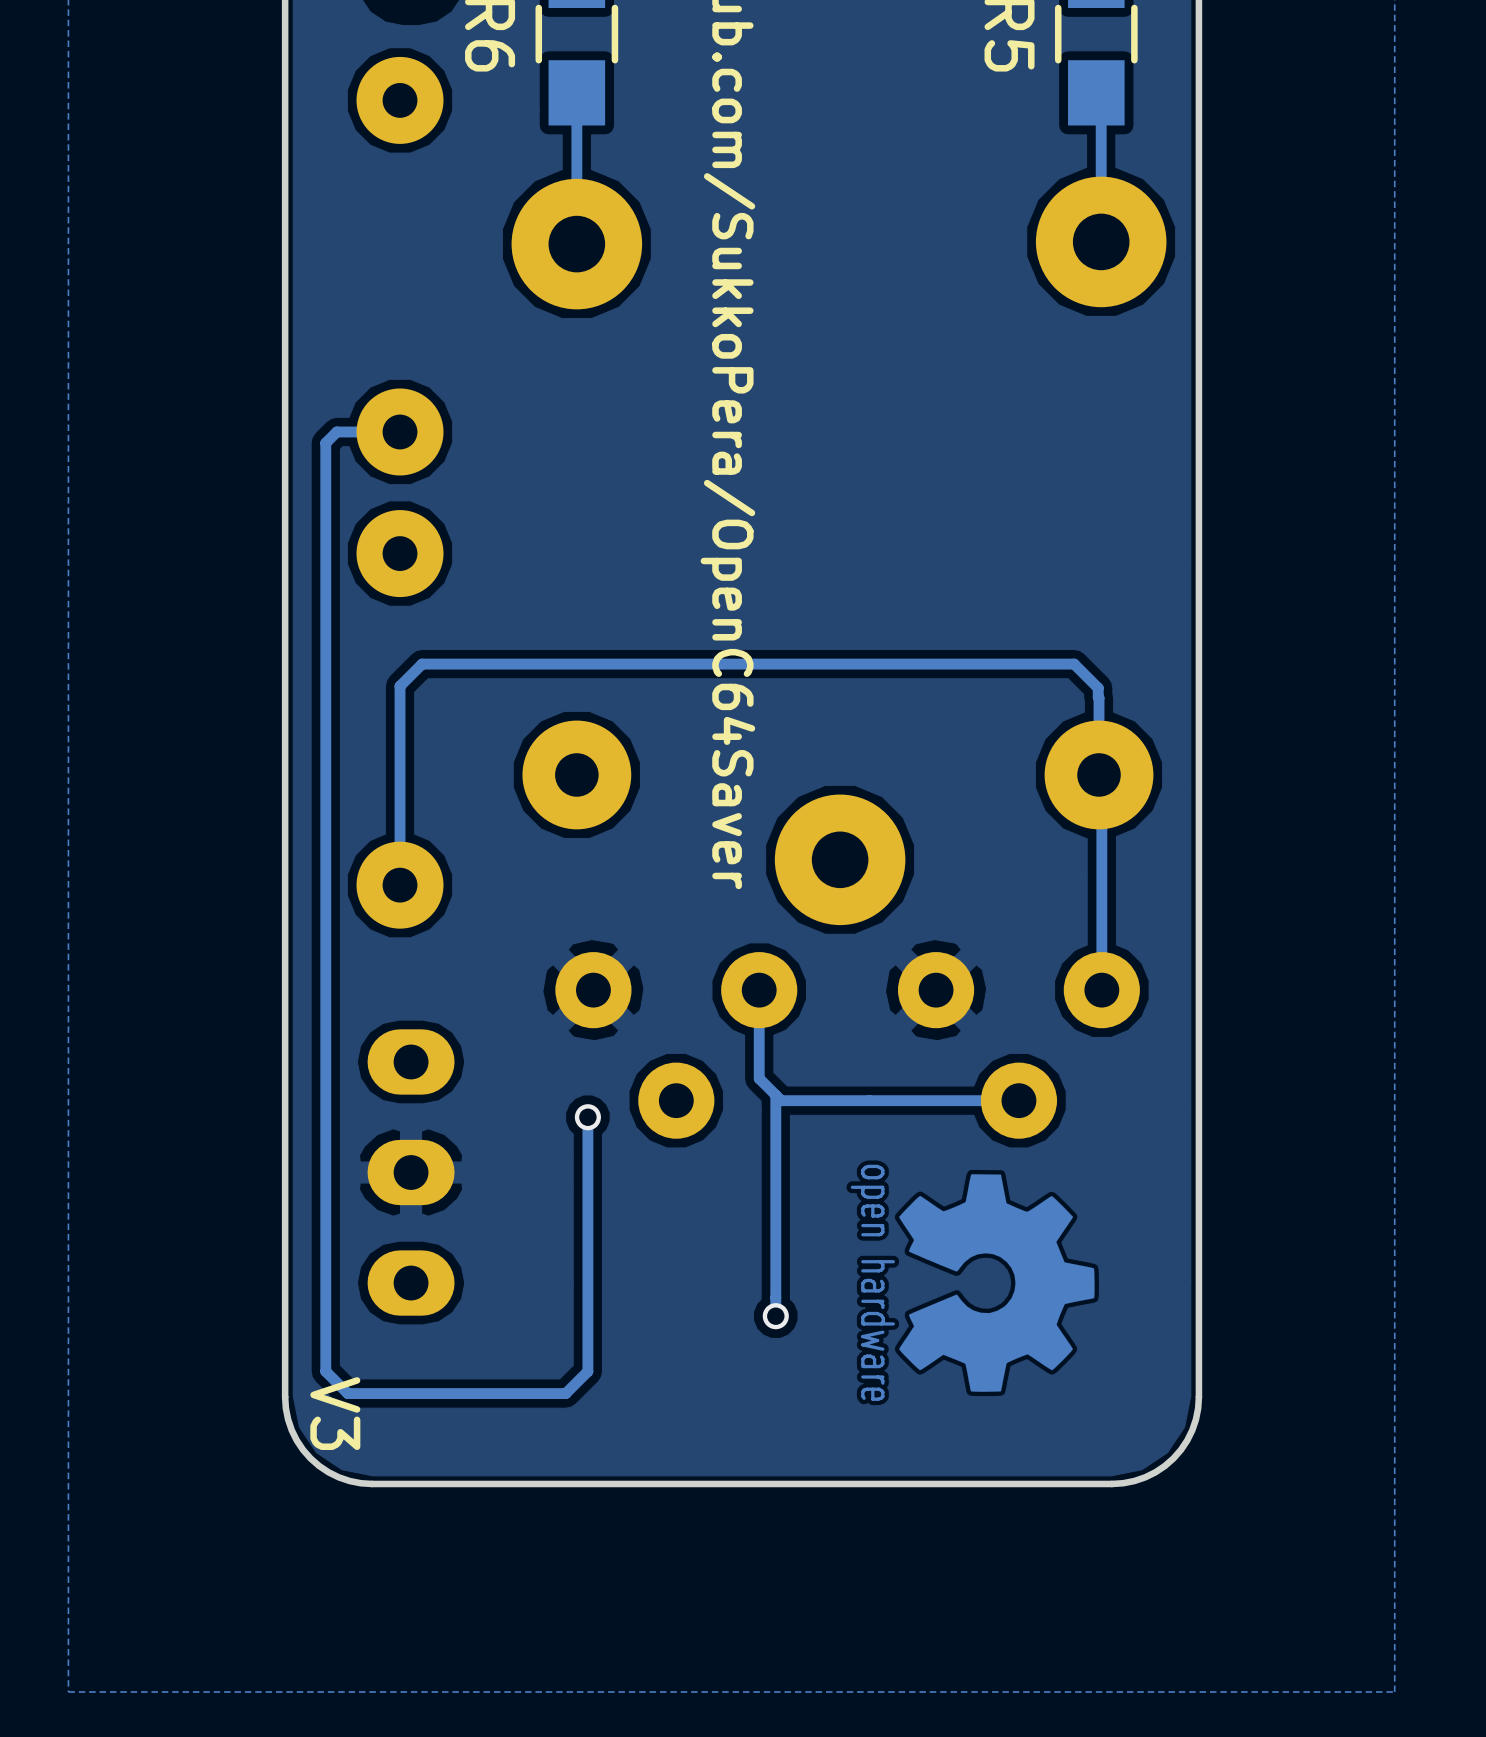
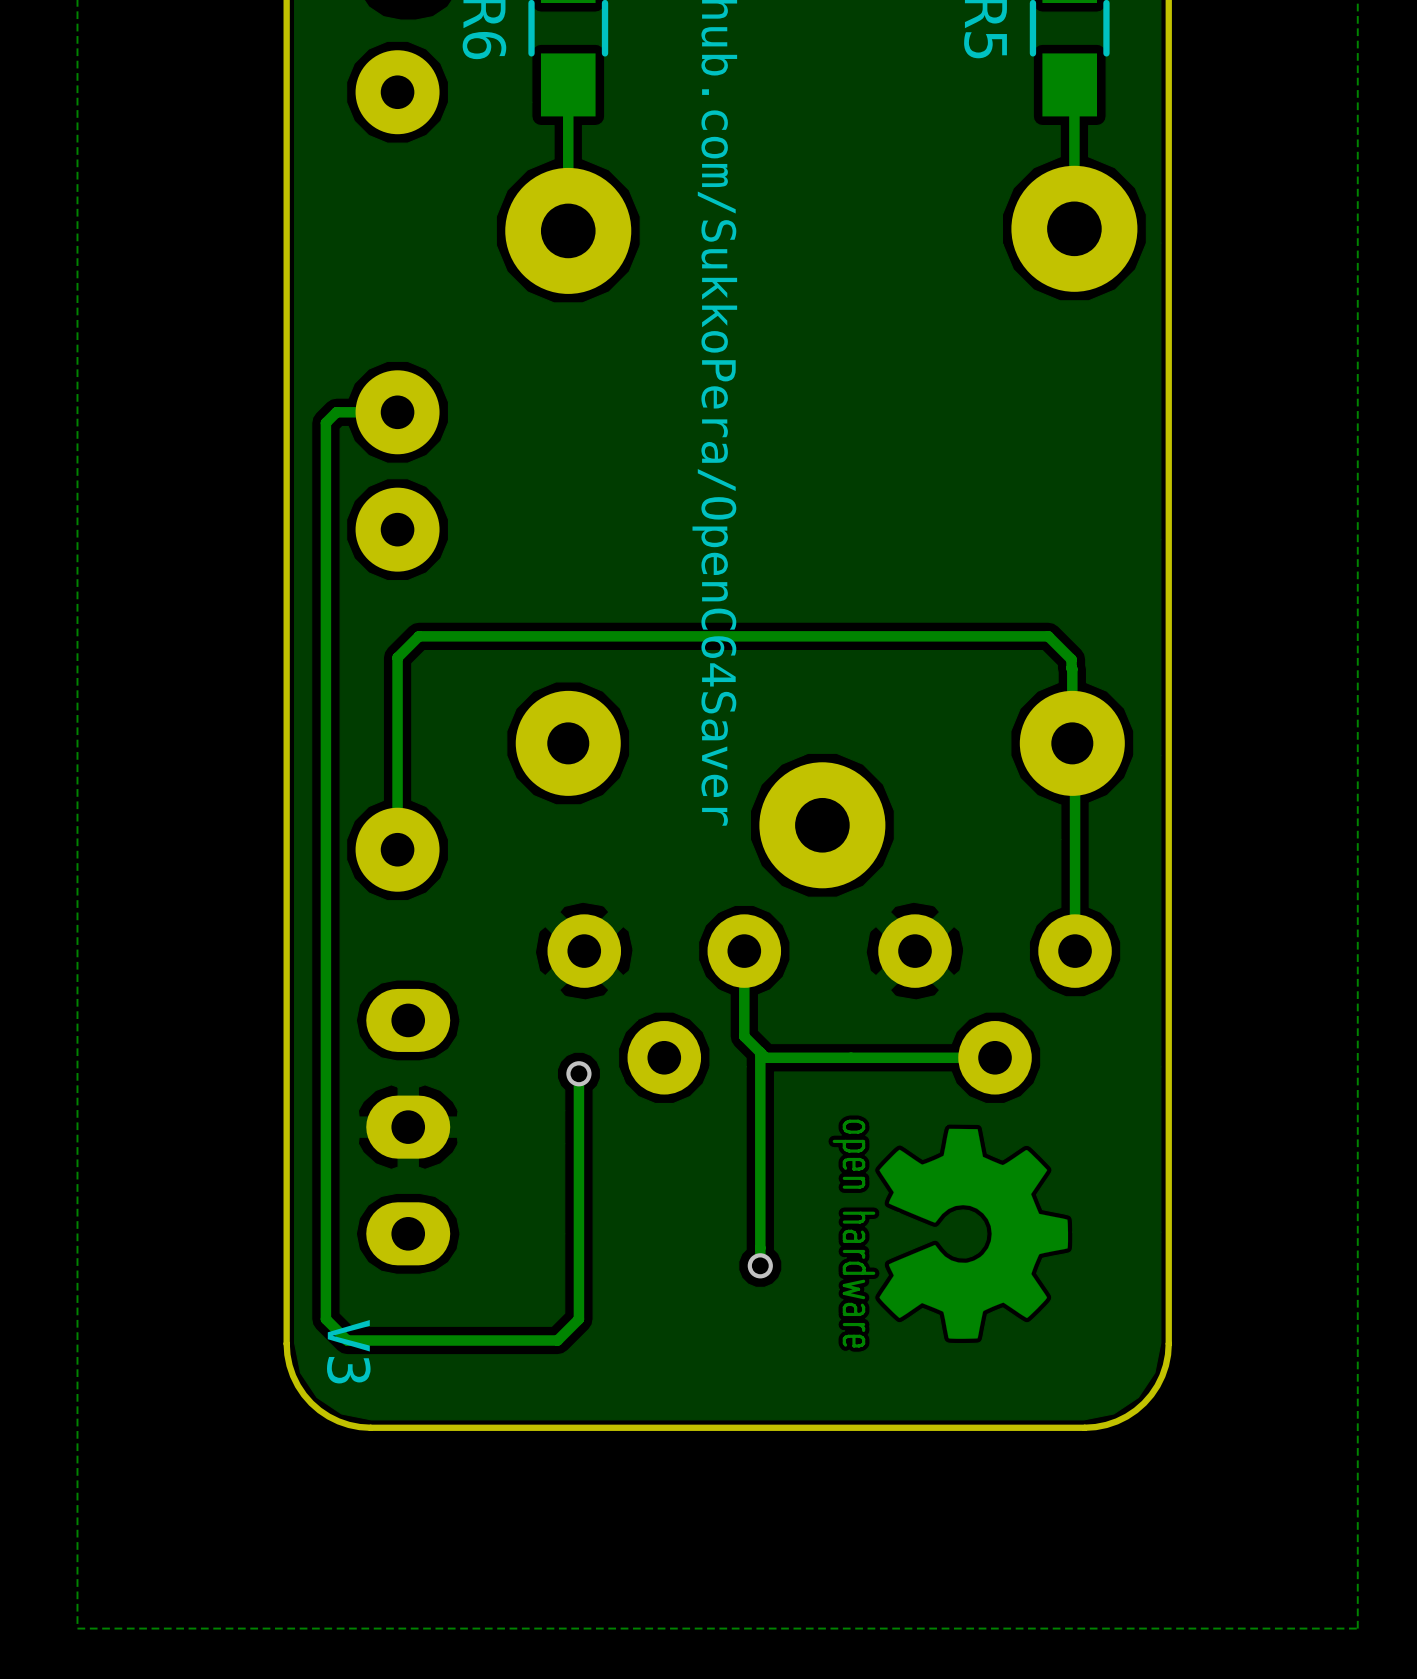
text position: V3 (335, 1413) -> V3 (348, 1351)

